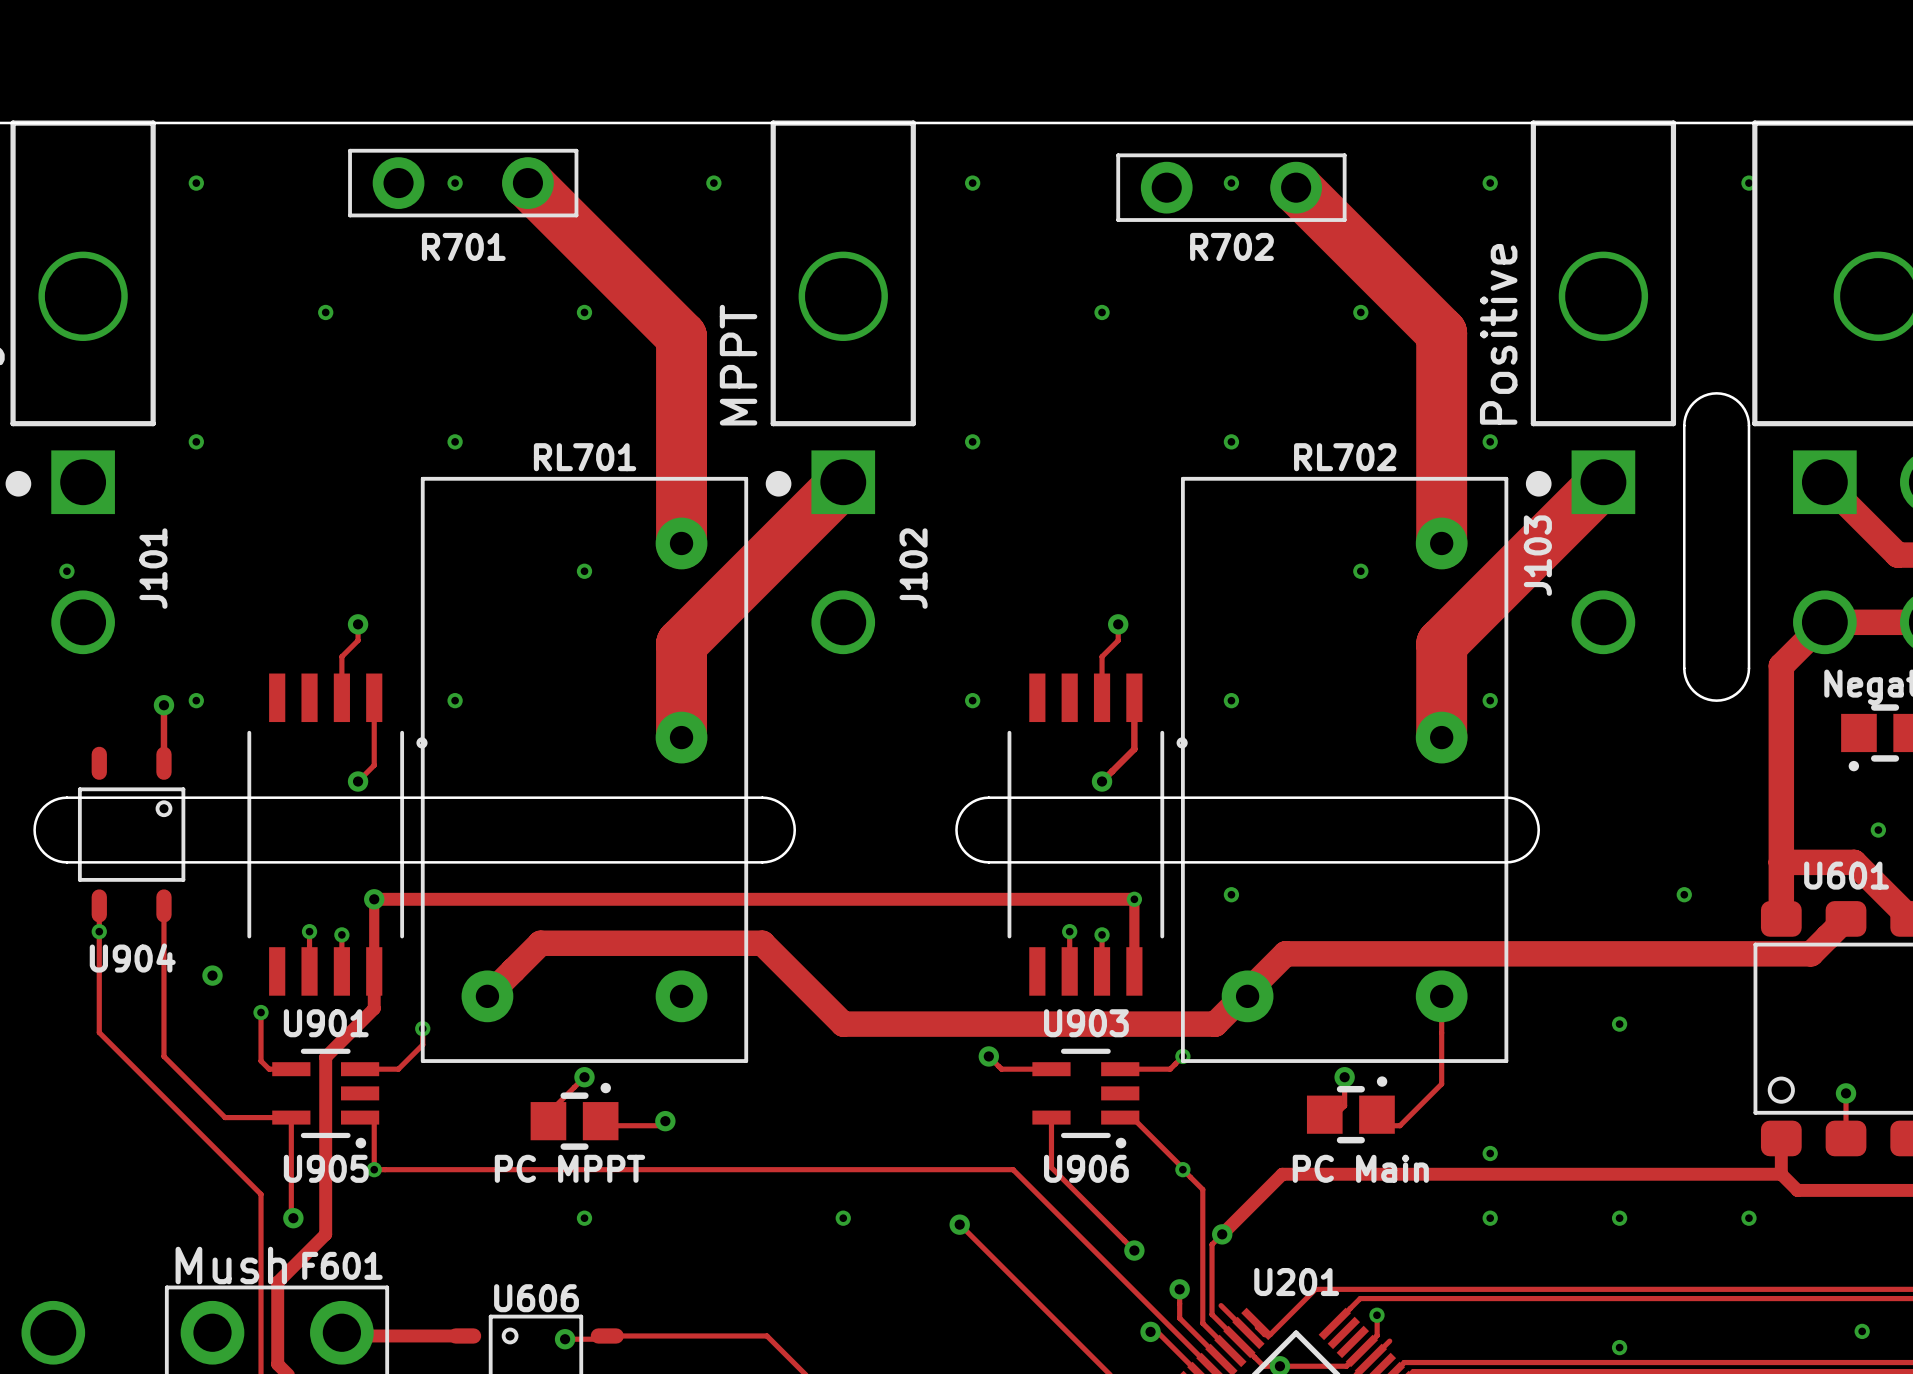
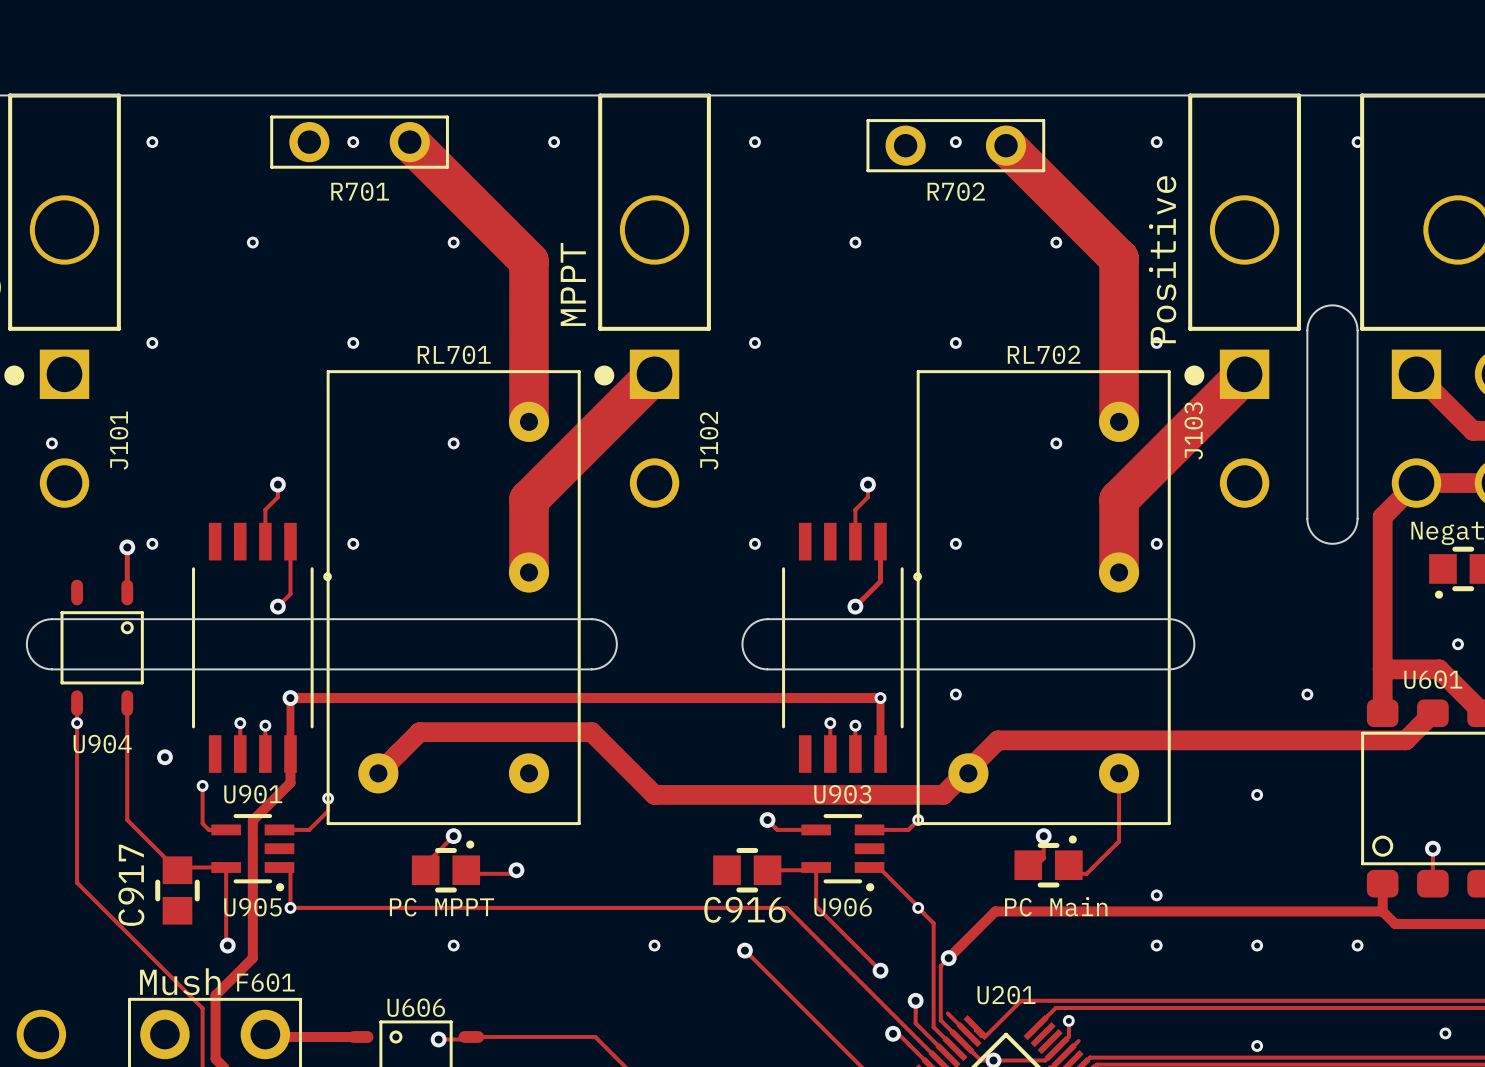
track: (99, 1032) (261, 1194) (261, 1299) -> (77, 801) (77, 882) (202, 1008)
track: none -> (816, 867) (813, 870) (767, 870)
C916: none -> (747, 870)
C917: none -> (177, 890)

